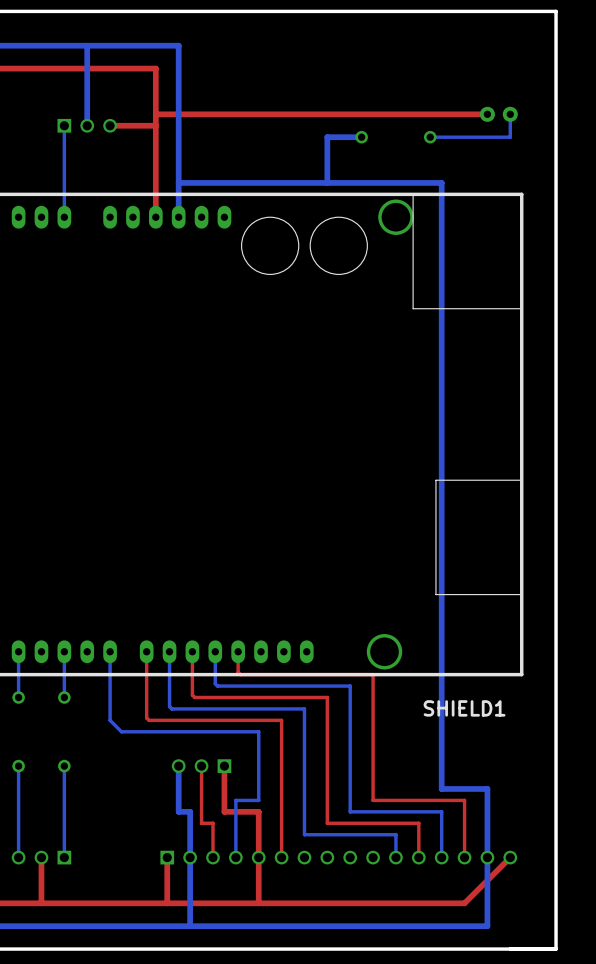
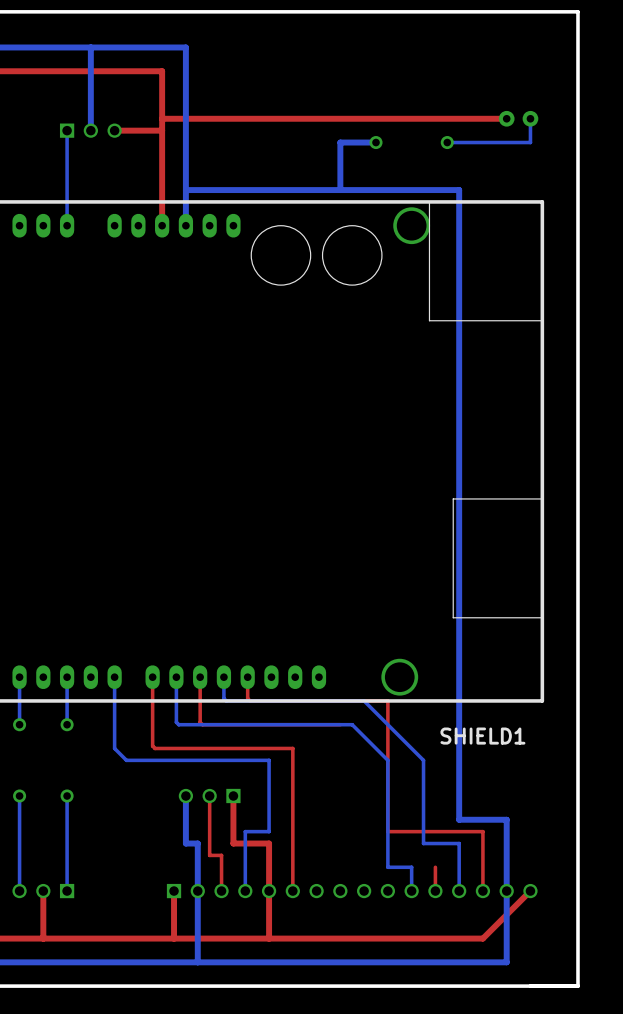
bottom track: (215, 672) (215, 683) (217, 686) (350, 686) (350, 811) (407, 811) -> (223, 698) (226, 700) (364, 700) (423, 760) (423, 843)
bottom track: (169, 695) (169, 706) (171, 708) (304, 708) (304, 834) (373, 834) -> (176, 722) (178, 724) (352, 724) (387, 760) (387, 867)
top track: (327, 697) (327, 823) (418, 823) (418, 834) -> none

